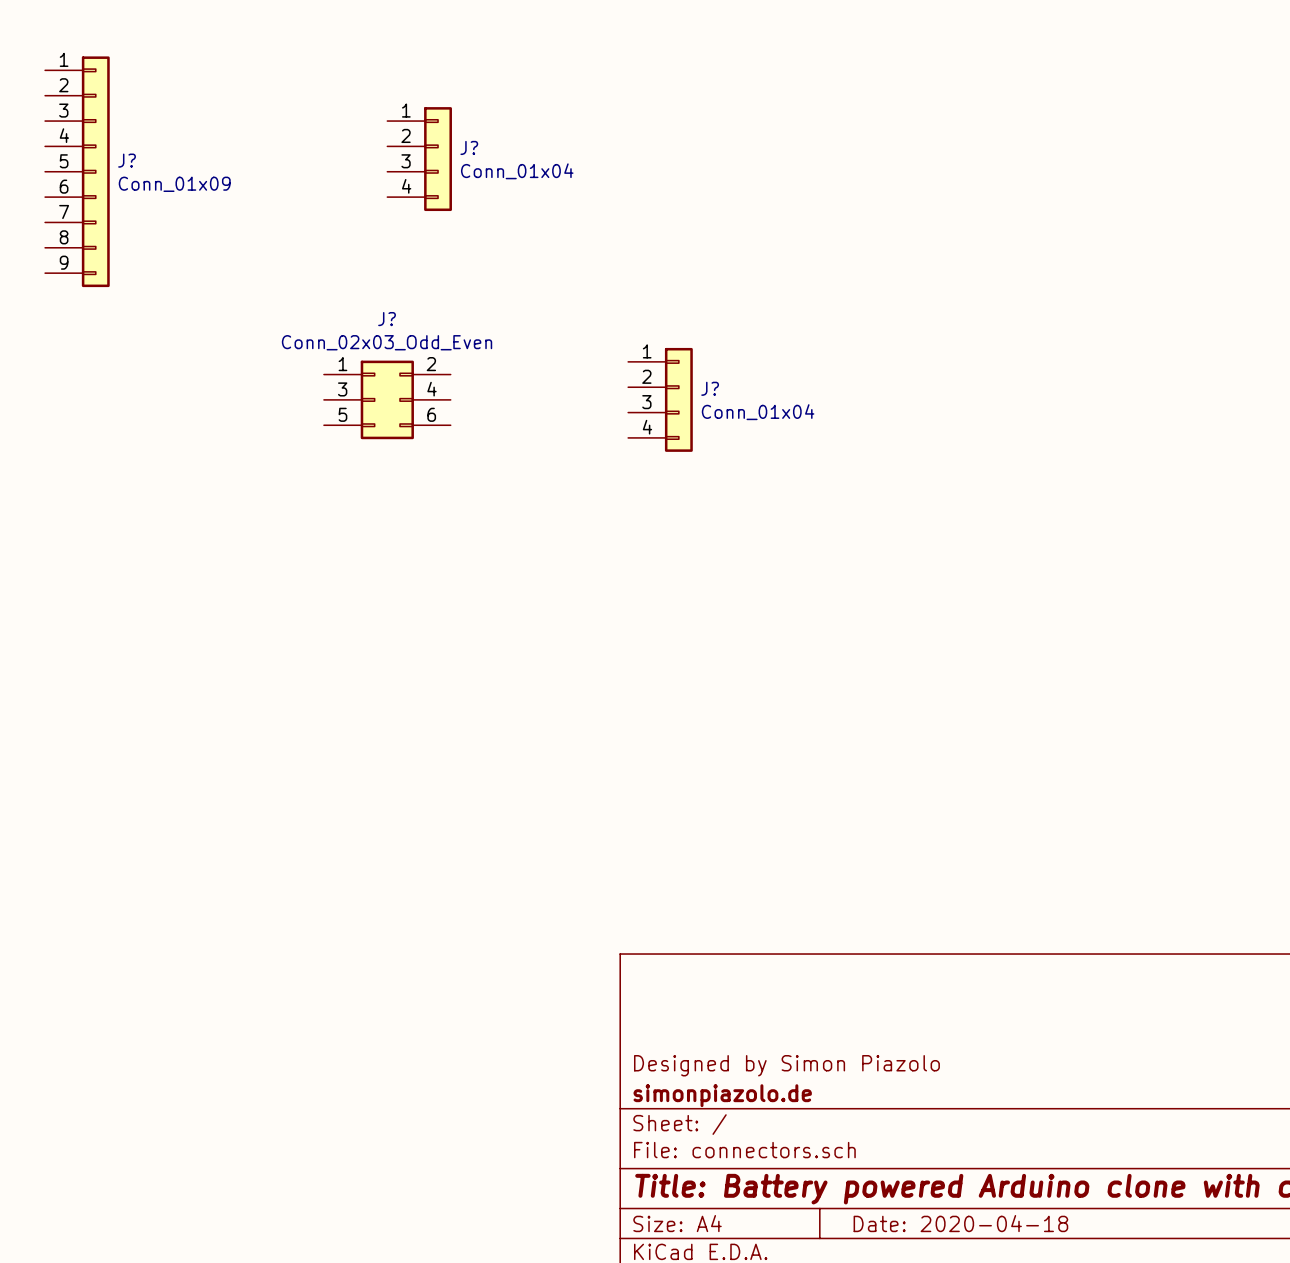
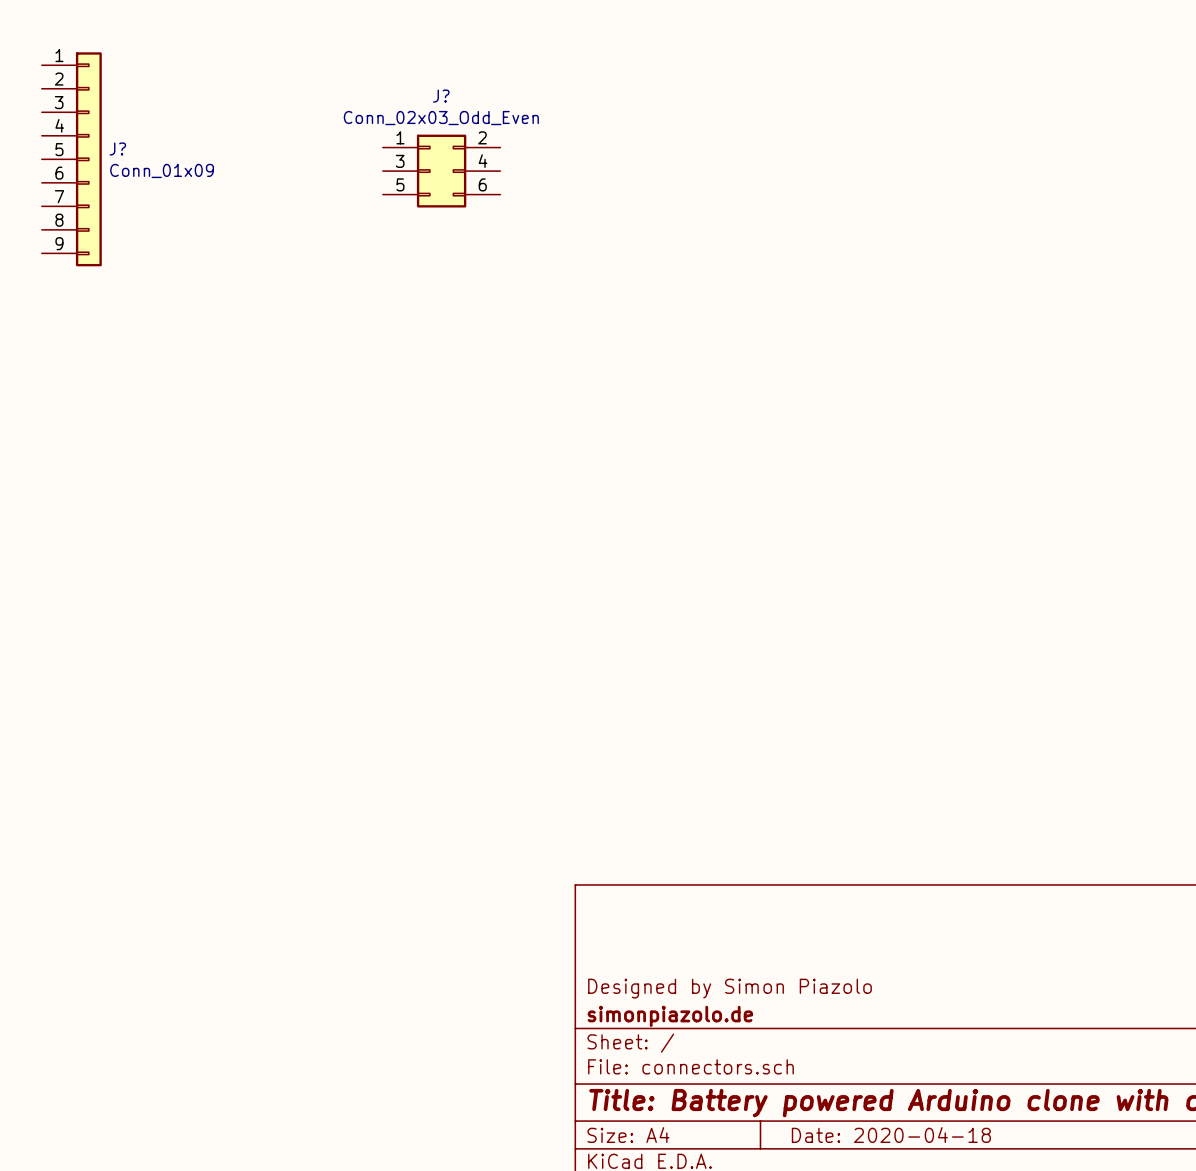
J?: Conn_01x04 (419, 159) -> none
J? position: (387, 399) -> (441, 171)
J?: Conn_01x04 (660, 399) -> none

